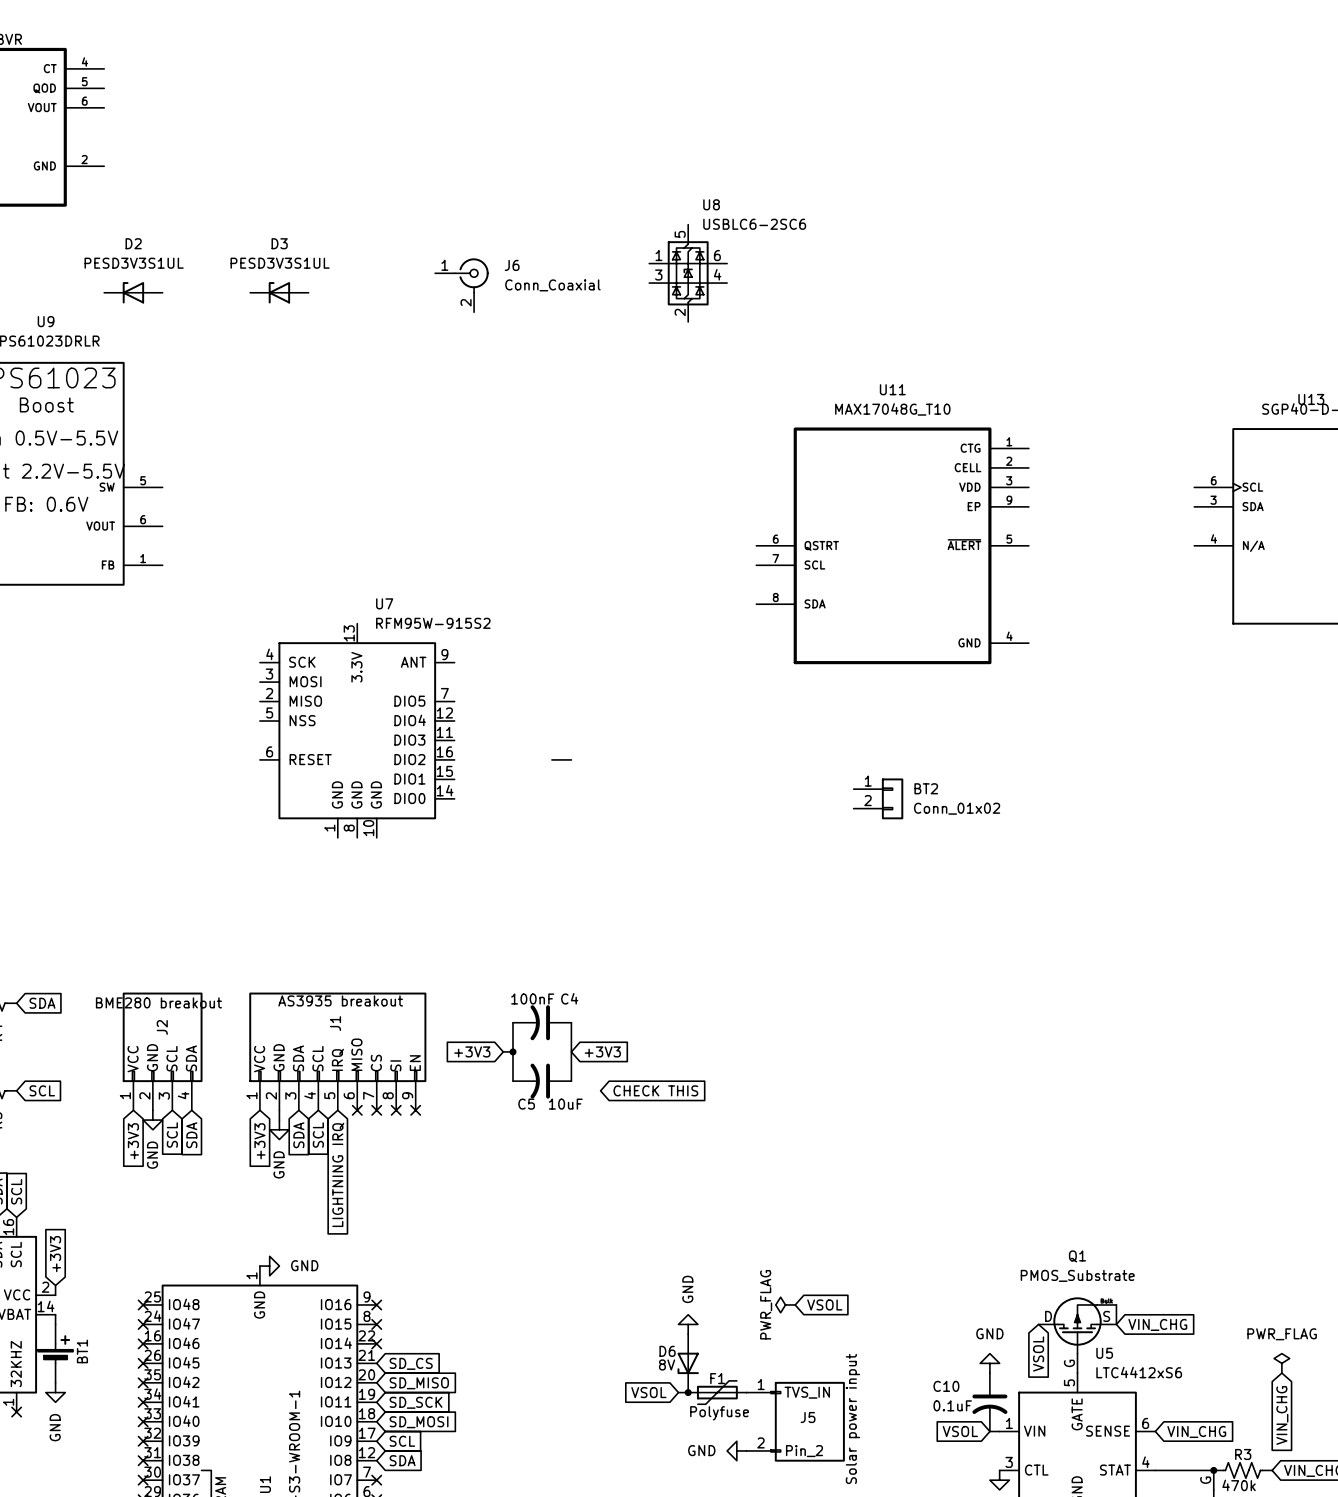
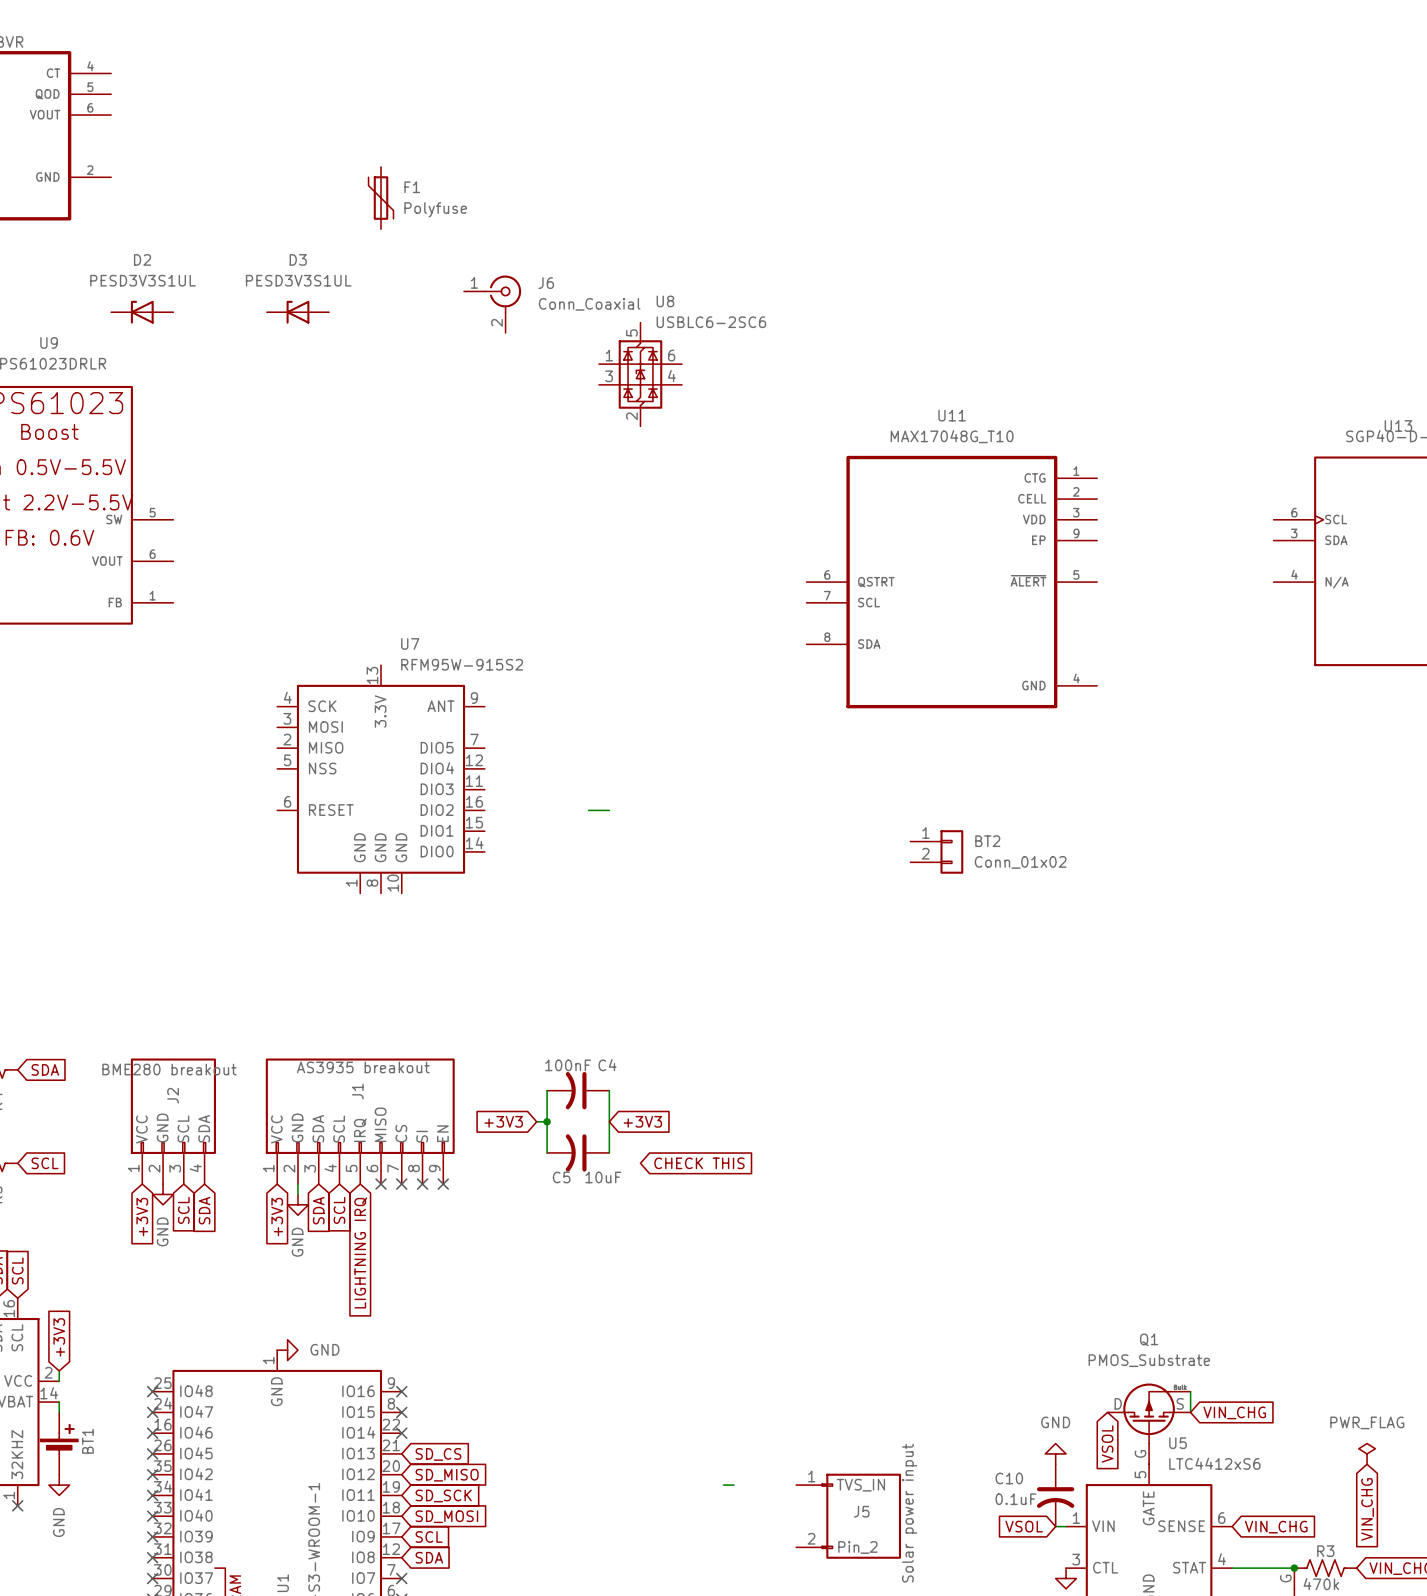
U8 position: (688, 273) -> (640, 374)
power symbol: PWR_FLAG (785, 1304) -> none
global label: VSOL (824, 1304) -> none
power symbol: GND (688, 1324) -> none
D6: 8V (688, 1363) -> none
F1 name position: F1 (717, 1378) -> F1 (412, 187)
global label: VSOL (648, 1392) -> none
junction: (688, 1392) -> none
F1 rotation: 0° (717, 1392) -> 90° clockwise (381, 198)
F1 position: (717, 1392) -> (381, 198)
F1 value position: Polyfuse (719, 1413) -> Polyfuse (435, 209)
power symbol: GND (736, 1450) -> none

